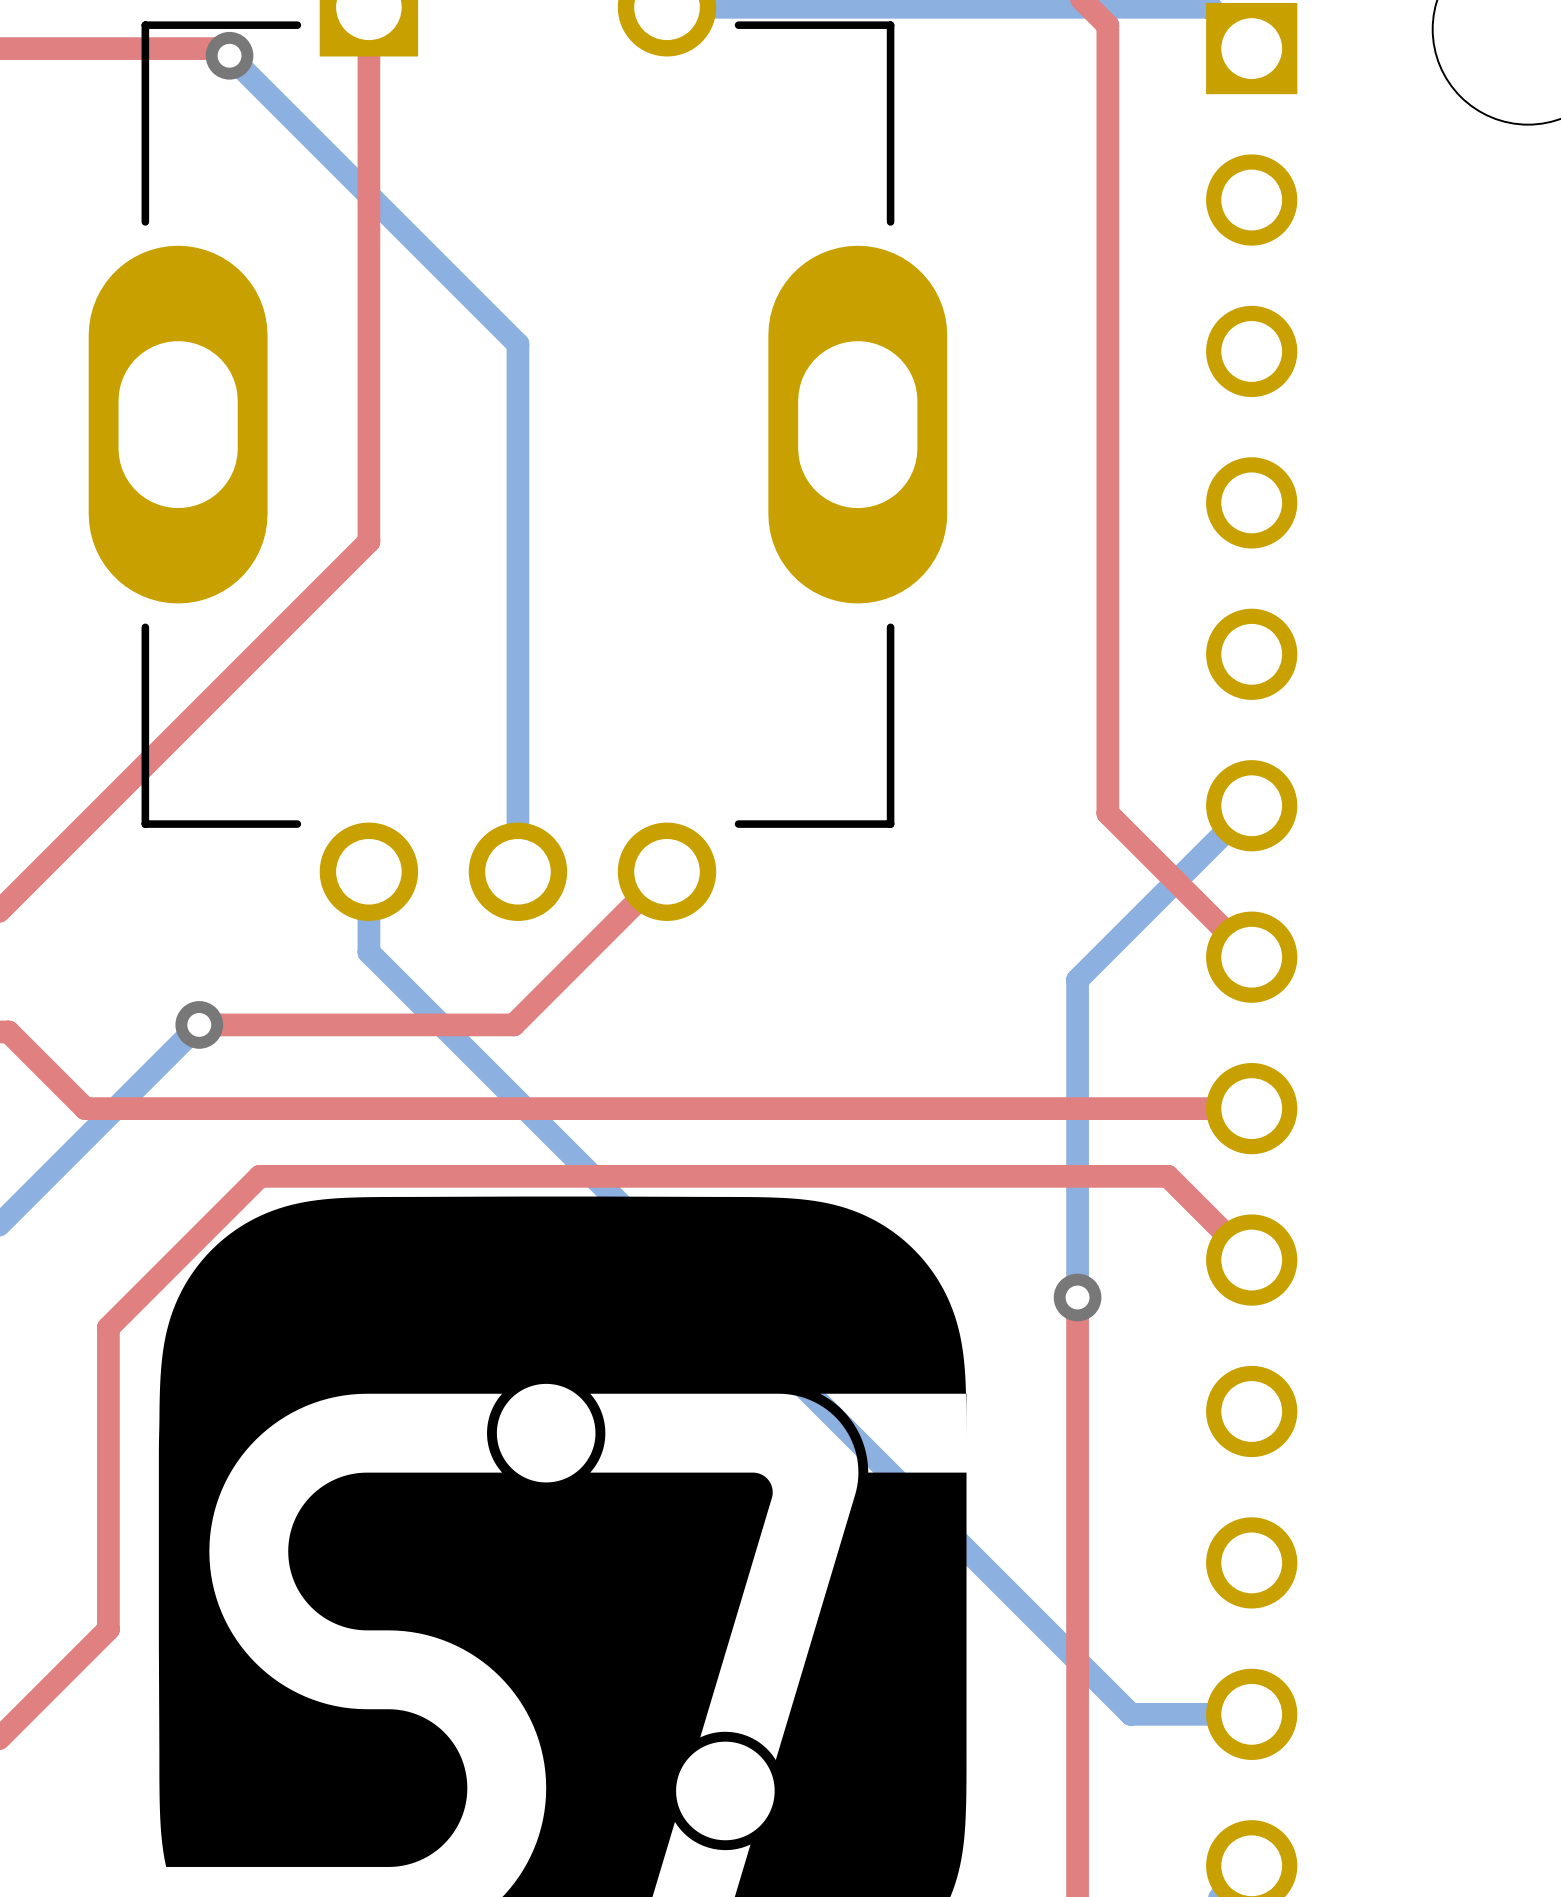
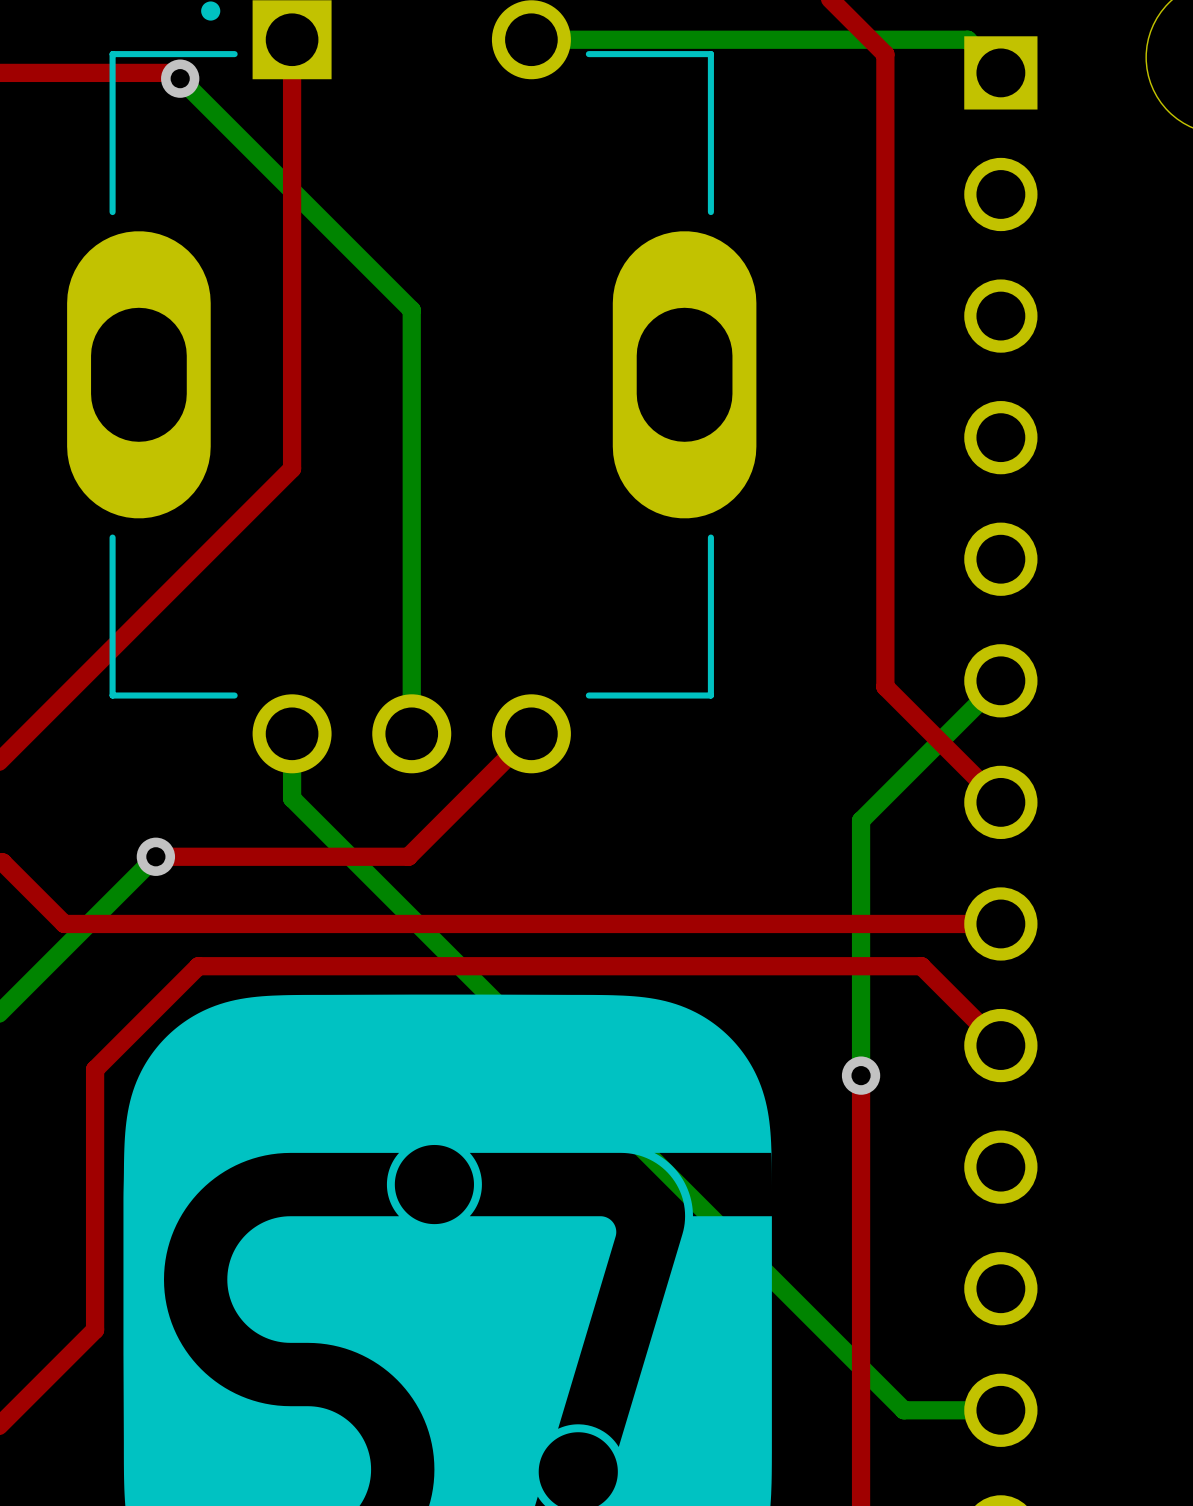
top track: (1168, 1176) (259, 1176) (108, 1327) (108, 1629) -> (933, 978) (921, 966) (198, 966) (95, 1069) (95, 1329) (82, 1342)

